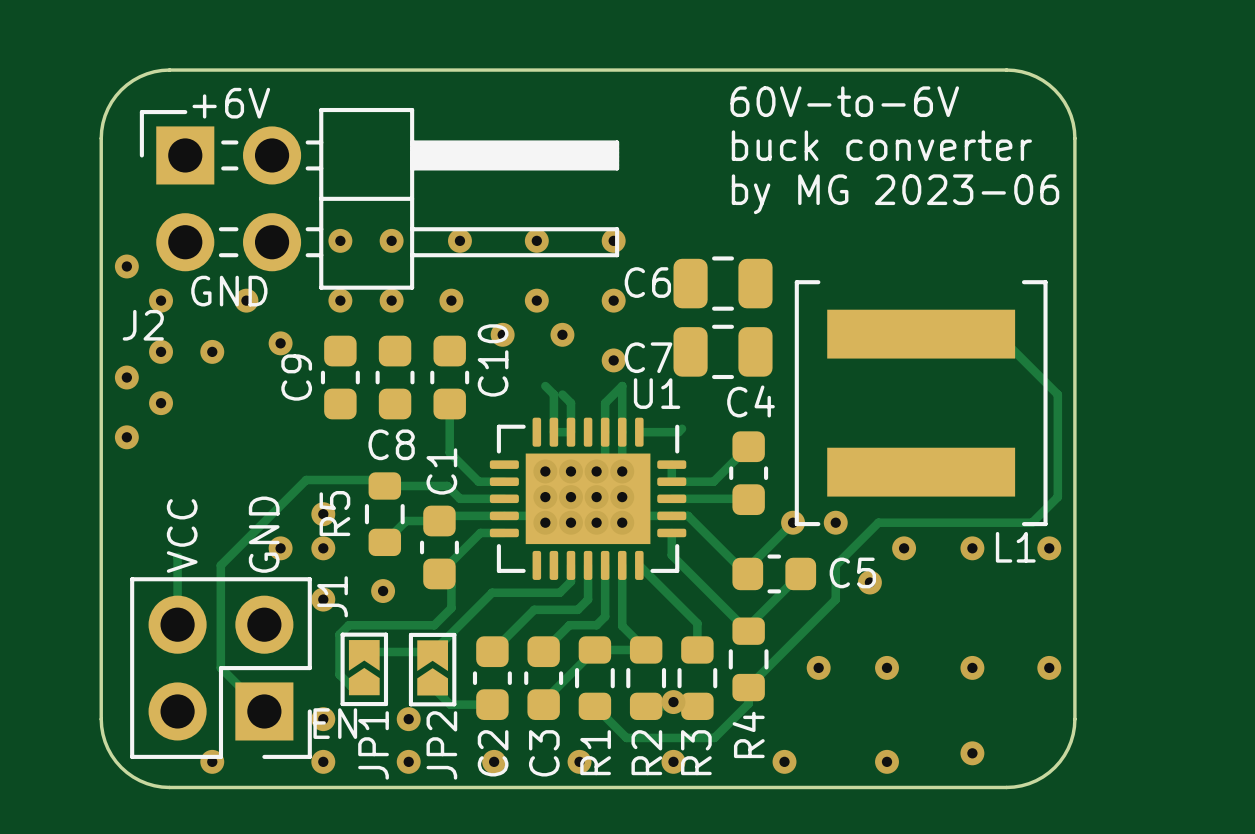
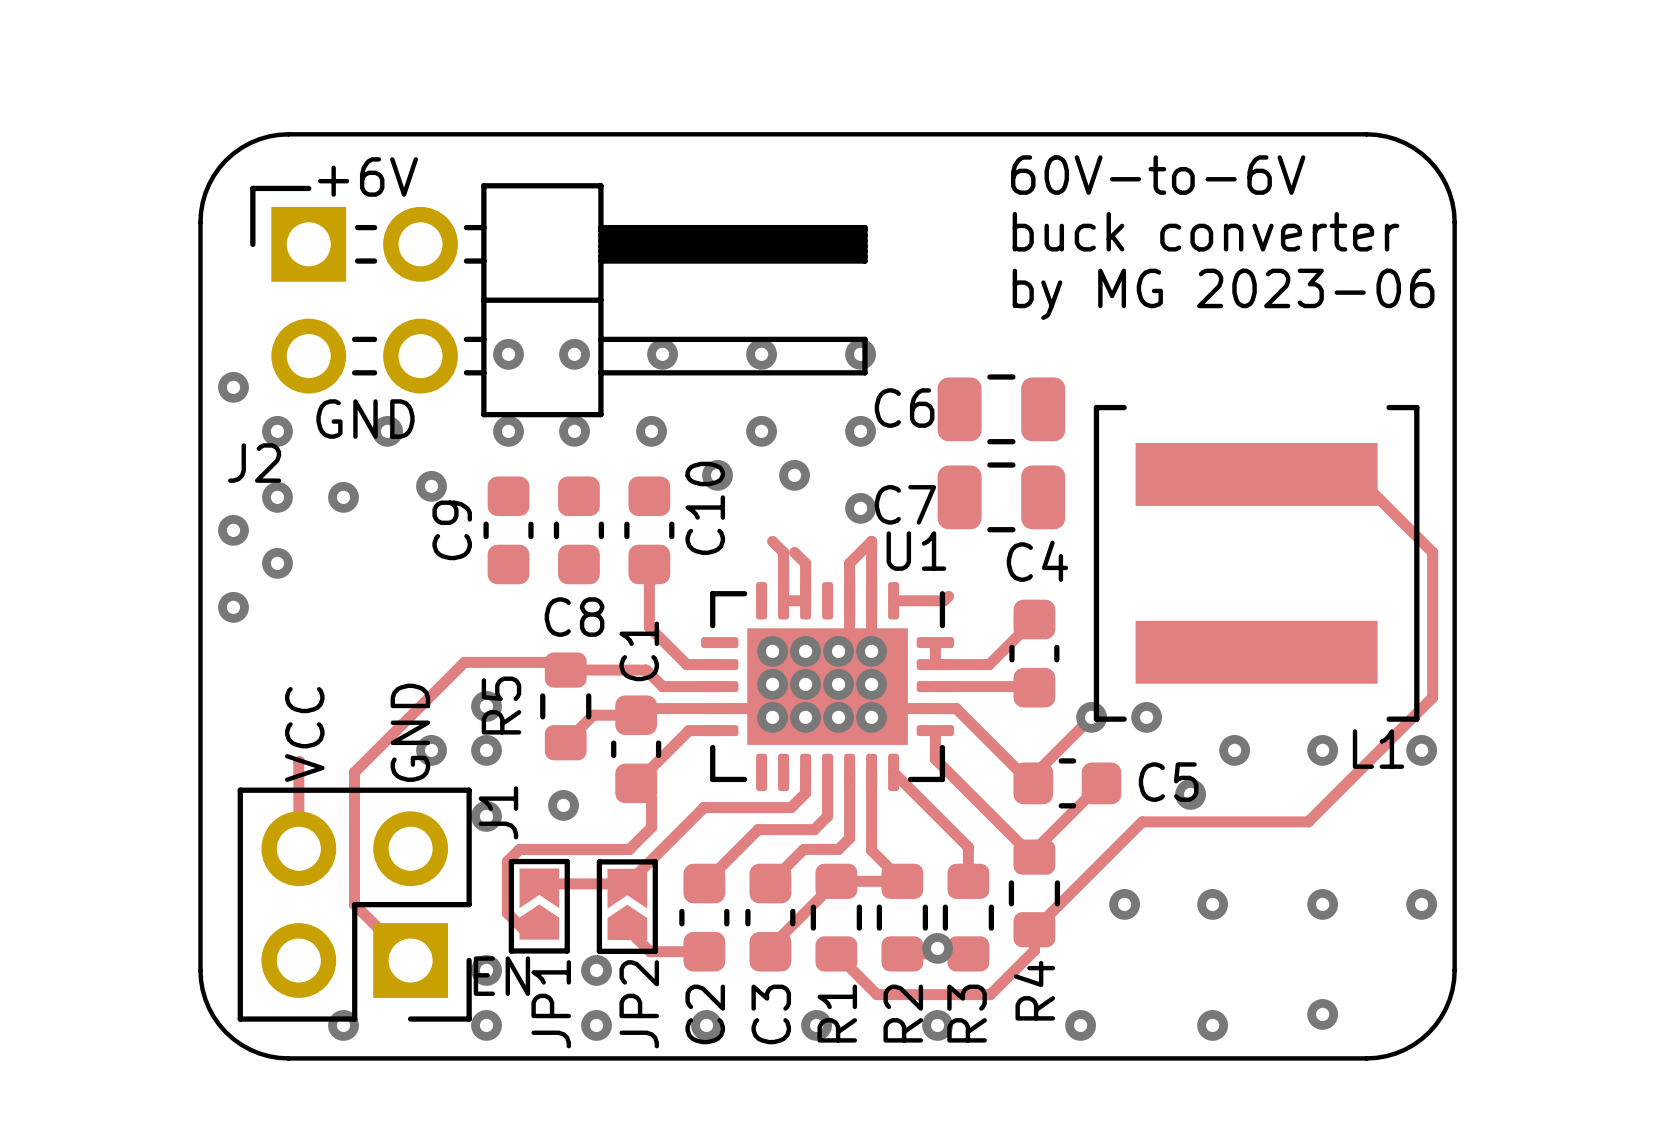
track: (1057, 497) (1032, 522) (878, 522) (835, 565) (835, 599) (748, 687) -> (1432, 684) (1432, 697) (1308, 821) (1142, 821) (1034, 929)

